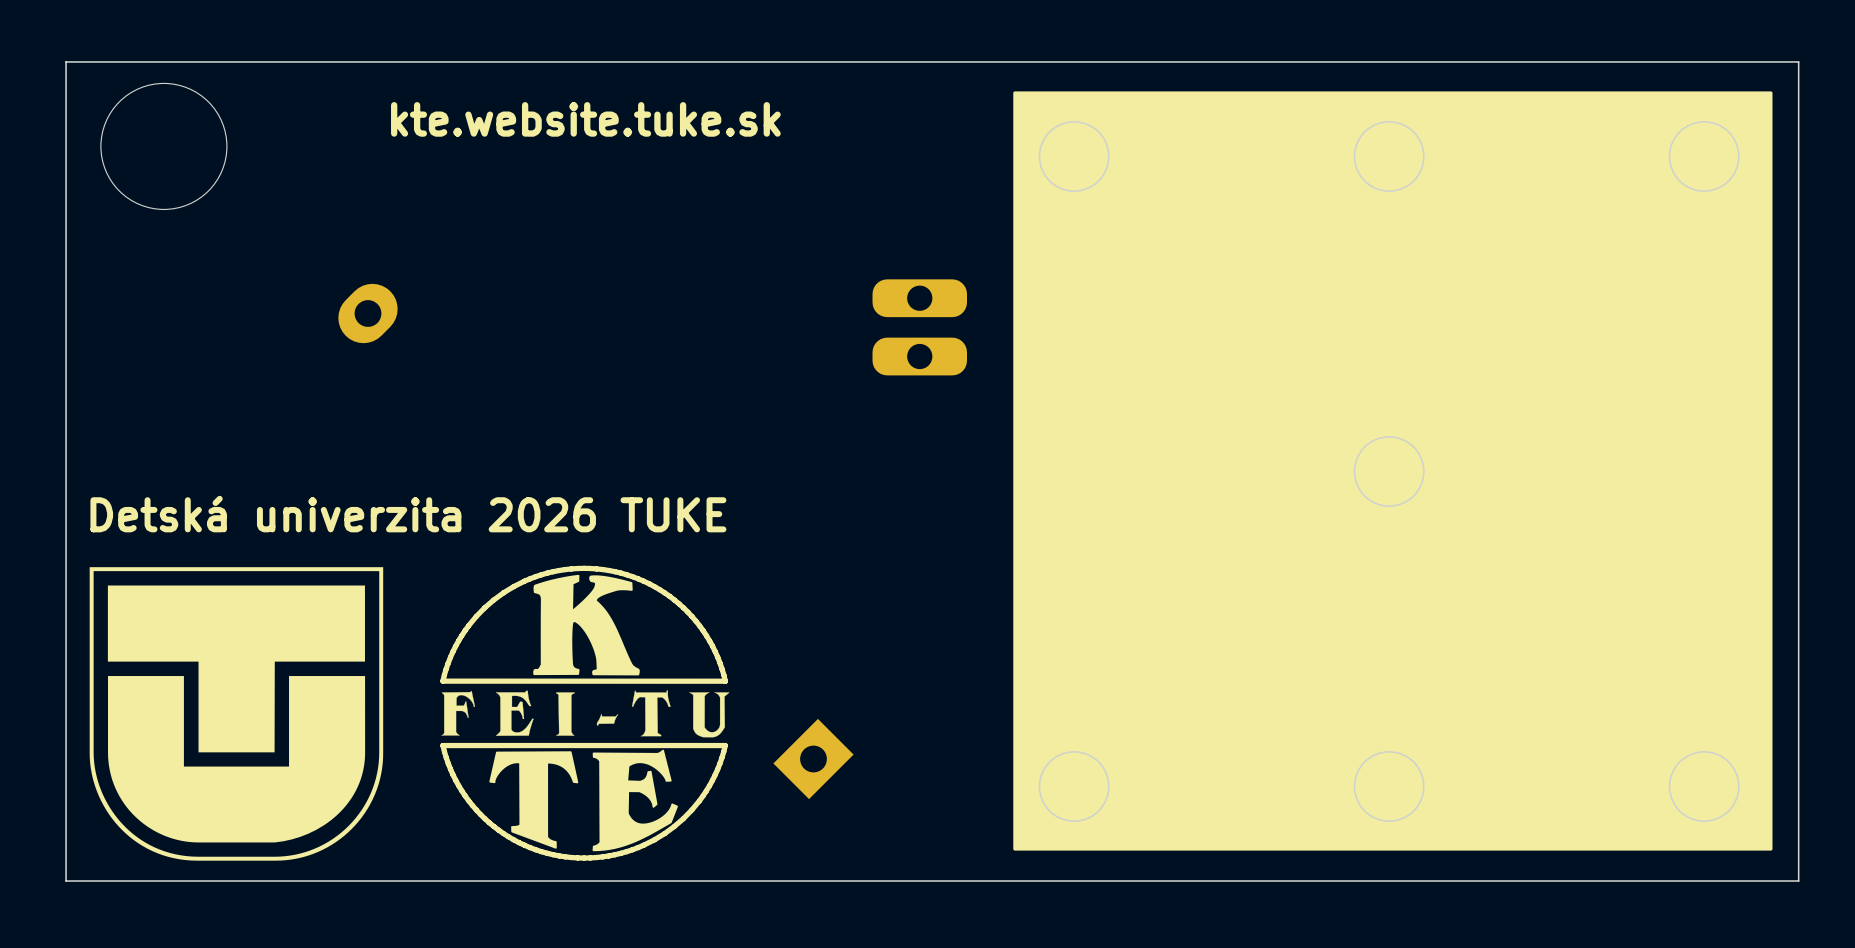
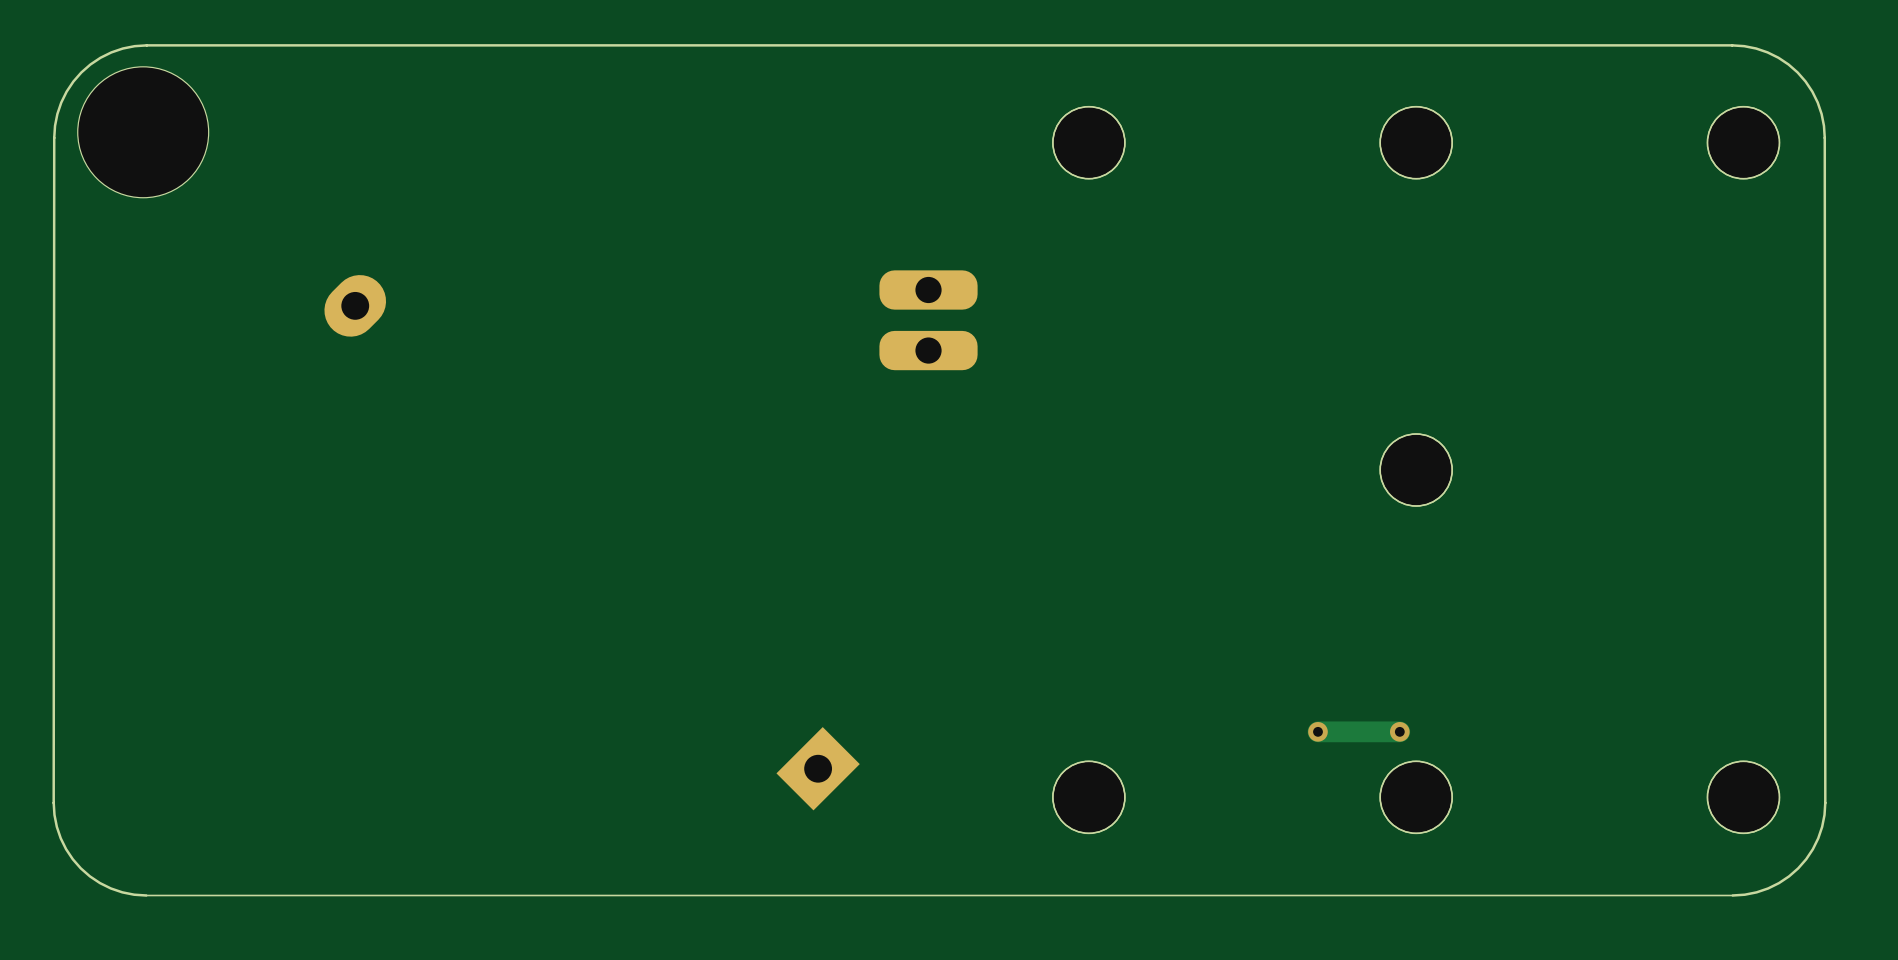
drawing: [1013, 91, 1773, 851] -> none
text: kte.website.tuke.sk (585, 119) -> none
text: Detská univerzita 2026 TUKE (408, 514) -> none
drawing: [89, 567, 384, 861] -> none
line: (590, 568) (565, 569) (541, 574) (513, 586) (493, 600) (476, 616) (461, 635) (450, 657) (442, 681) (725, 681) (720, 663) (709, 640) (695, 621) (679, 603) (659, 589) (638, 578) (615, 571) (590, 568) -> none
drawing: [441, 574, 730, 852] -> none
line: (725, 745) (442, 745) (450, 769) (461, 790) (476, 810) (493, 826) (513, 839) (535, 849) (559, 855) (584, 858) (608, 855) (632, 849) (654, 839) (674, 826) (691, 810) (706, 790) (717, 769) (725, 745) -> none
board edge: (1693, 881) (1798, 881) (1798, 61) (66, 61) (66, 881) (166, 881) -> (1732, 895) (1744, 894) (1768, 888) (1789, 876) (1798, 868) (1812, 849) (1818, 838) (1824, 815) (1825, 802) (1823, 125) (1817, 102) (1805, 81) (1797, 72) (1778, 57) (1767, 52) (1756, 48) (1732, 45) (146, 45) (122, 48) (100, 57) (81, 72) (66, 91) (57, 113) (54, 137) (53, 802) (54, 815) (60, 838) (66, 849) (80, 868) (99, 883) (110, 888) (134, 894) (146, 895)

